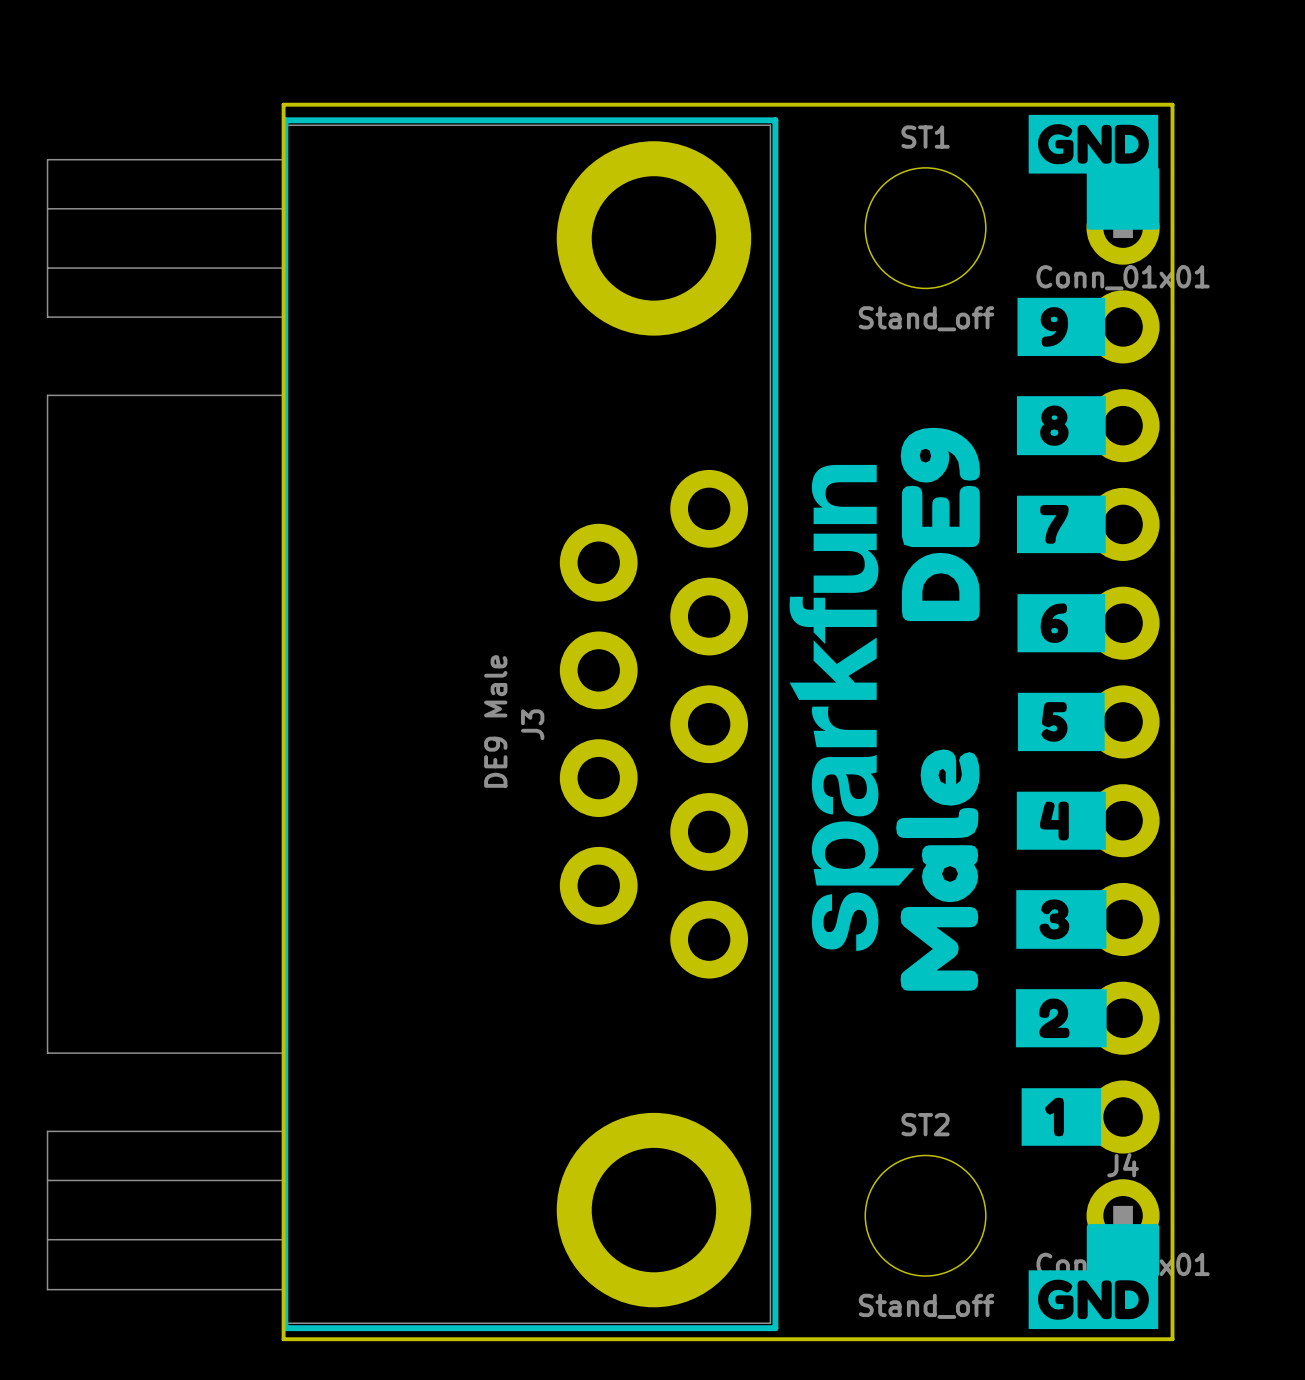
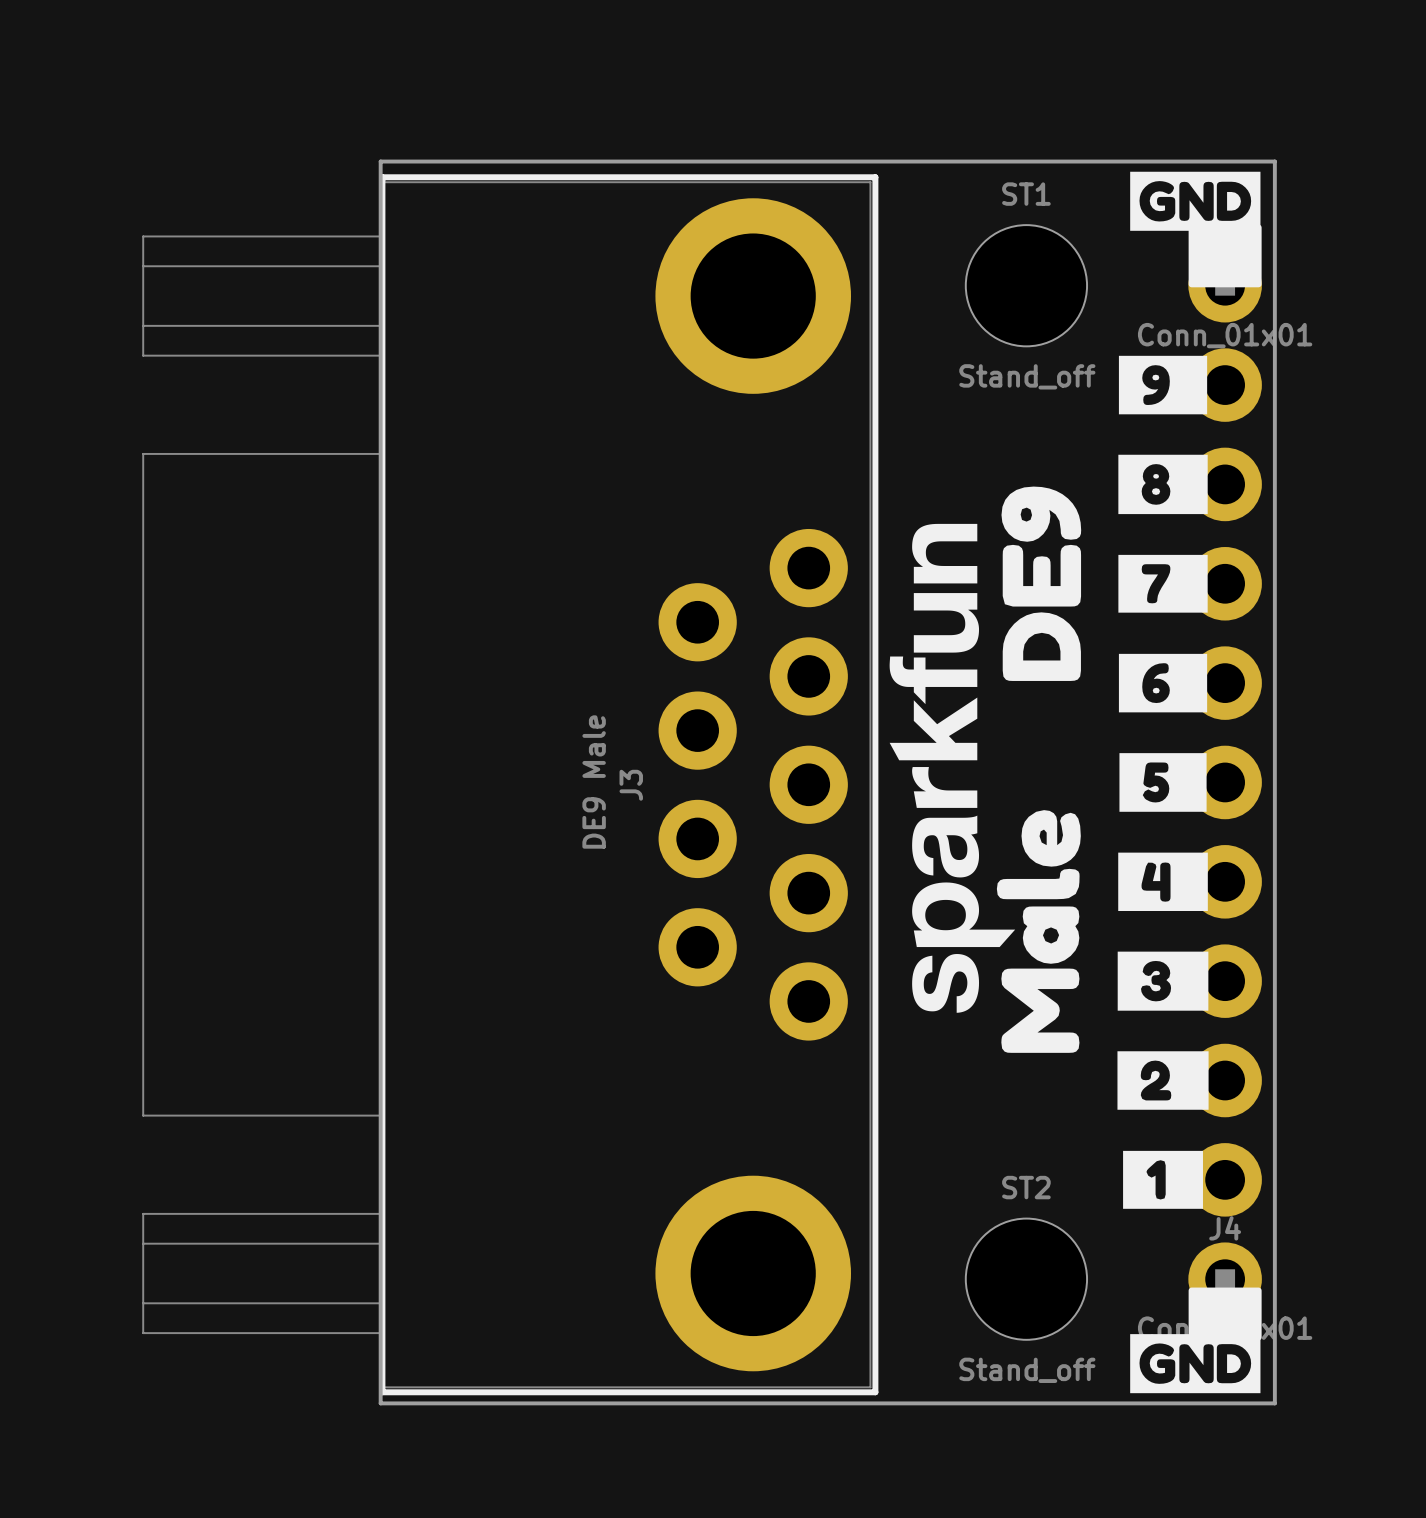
J3 footprint: [47, 117, 779, 1332] -> [142, 174, 879, 1396]

